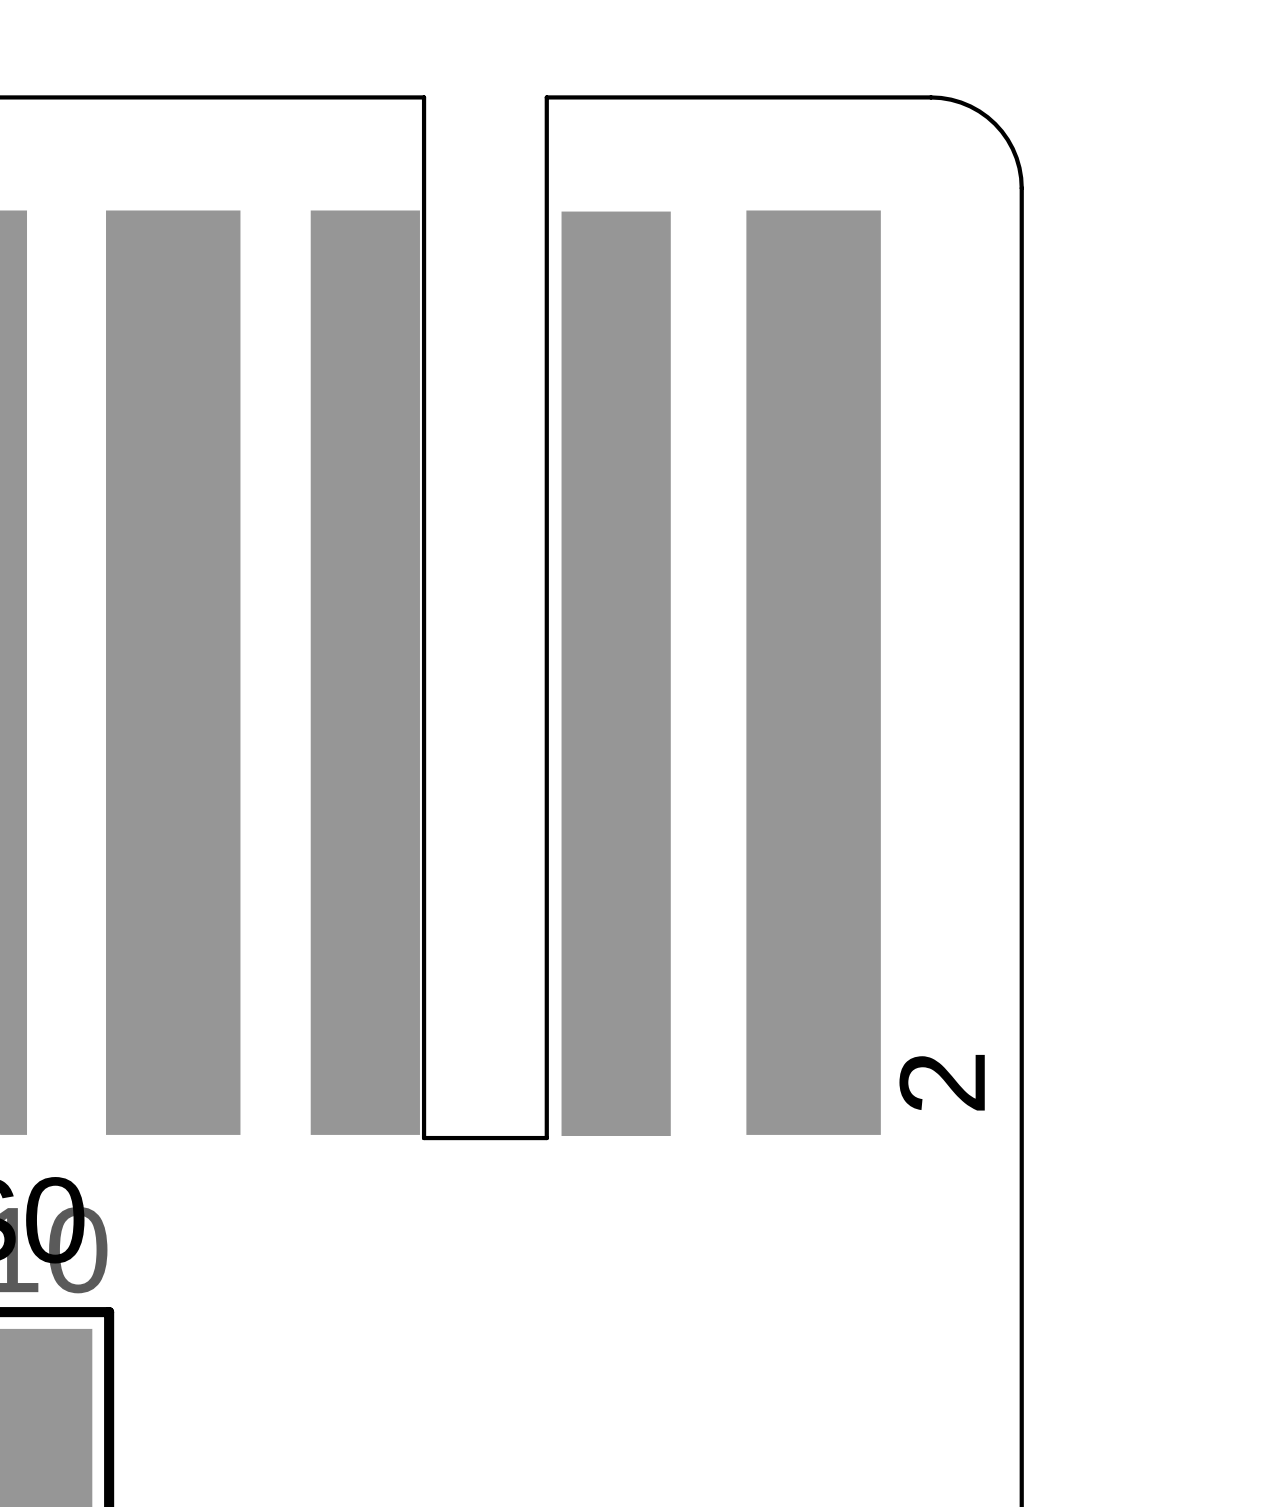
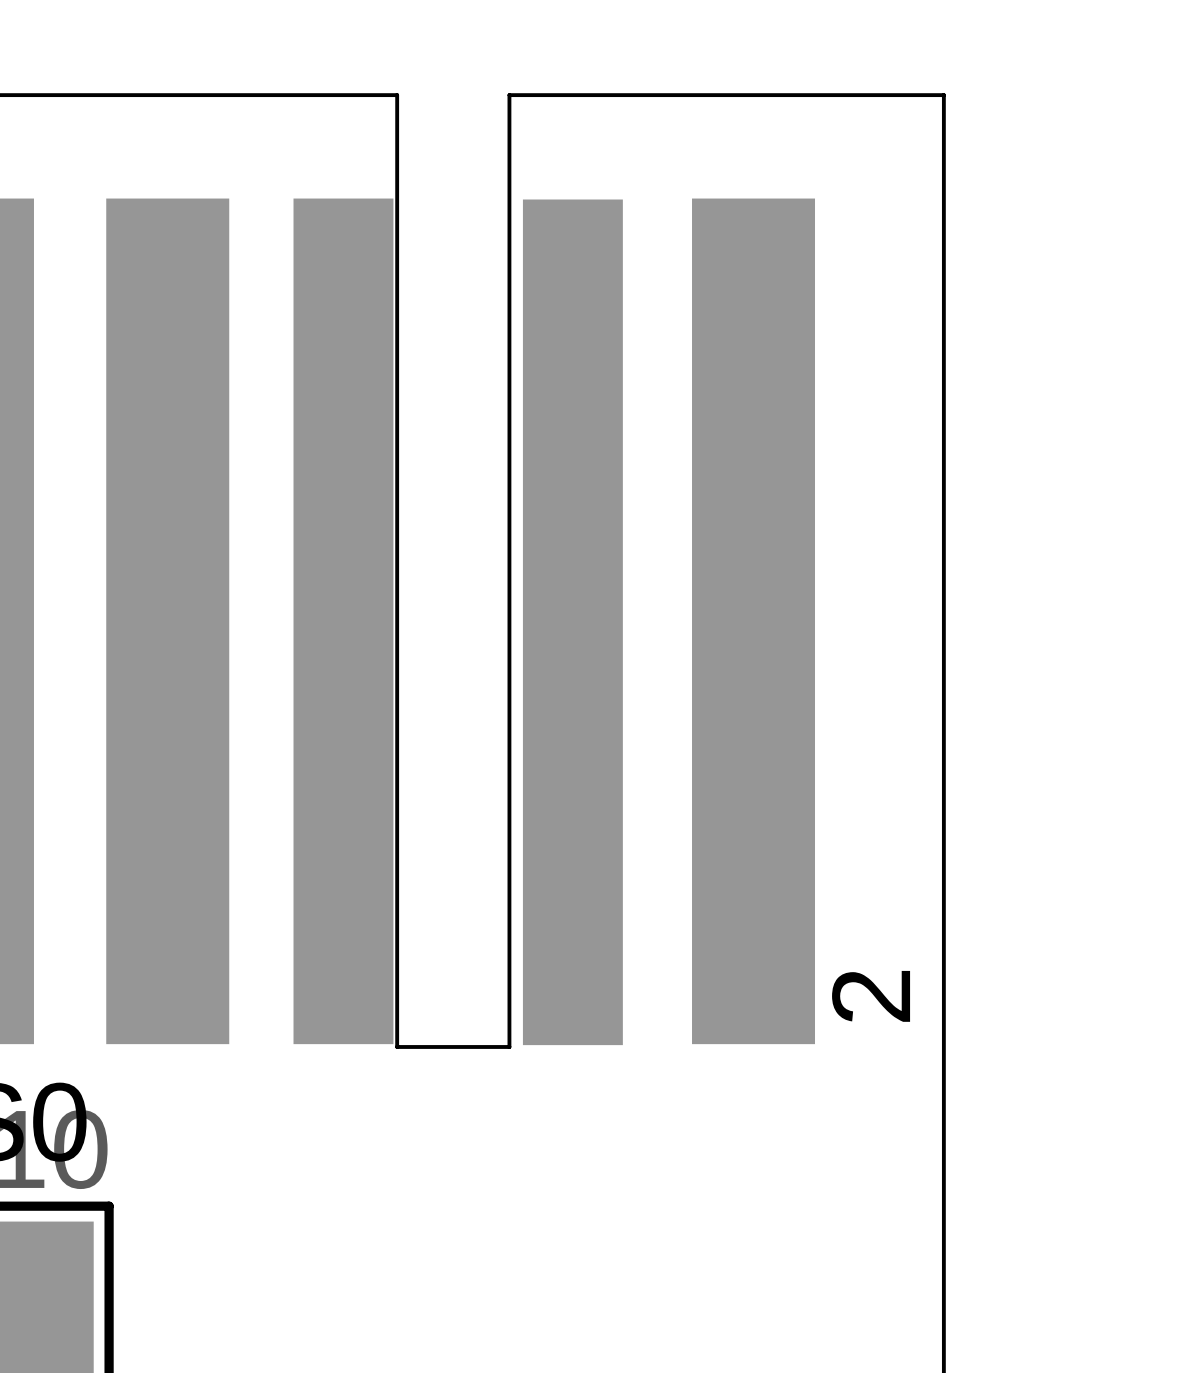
board edge: (931, 97) (951, 99) (970, 106) (995, 124) (1012, 148) (1019, 167) (1021, 188) -> (860, 95) (943, 95) (943, 178)

